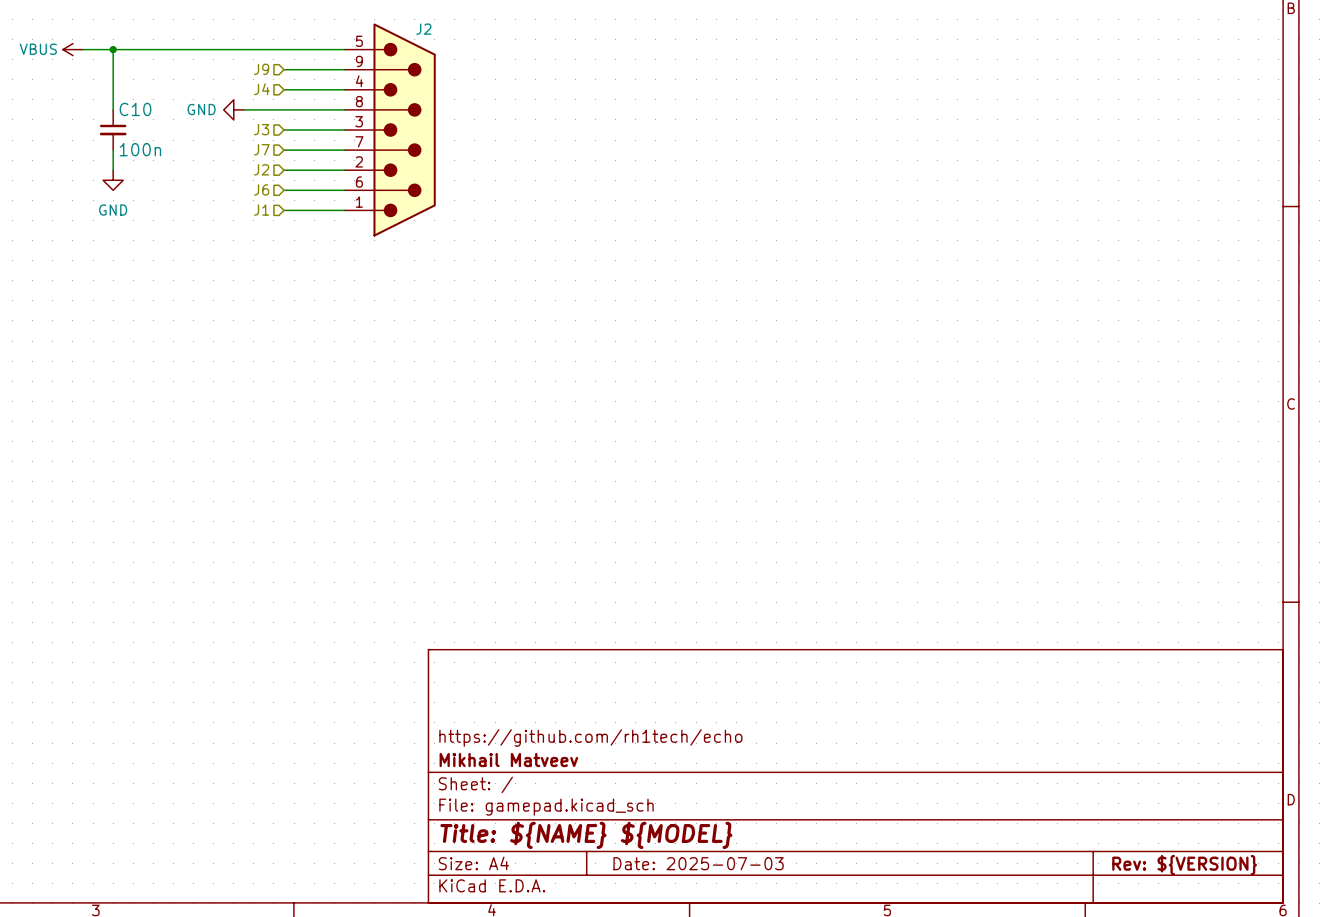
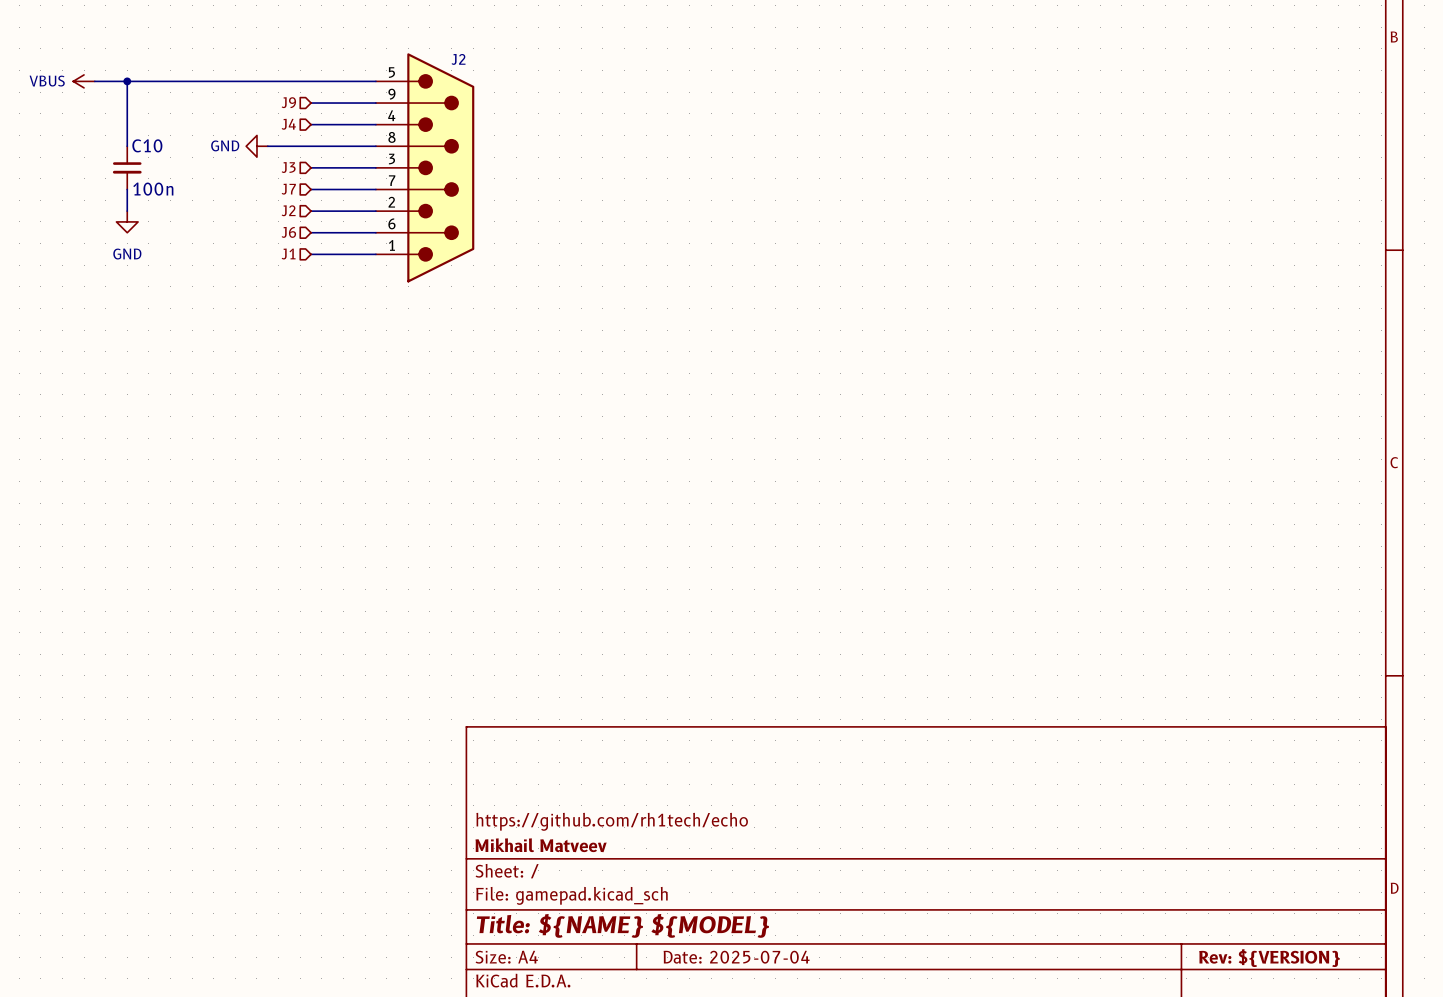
title block: Date: 2025-07-03 (698, 863) -> Date: 2025-07-04 (736, 957)

